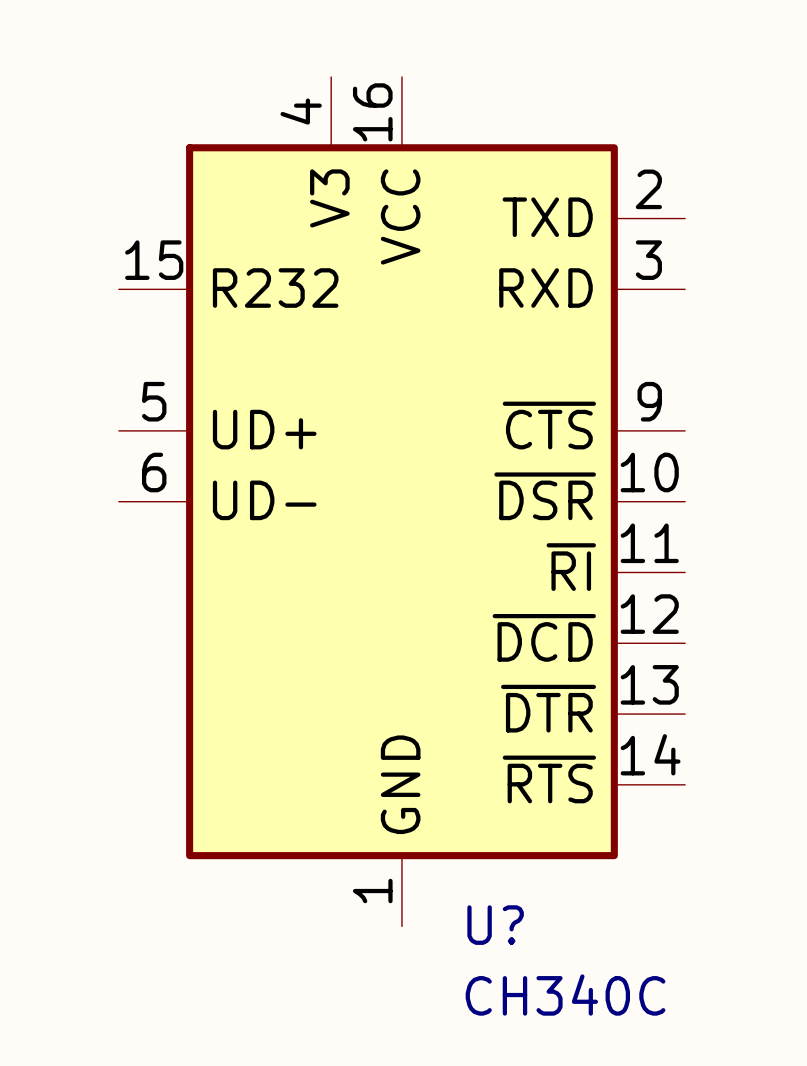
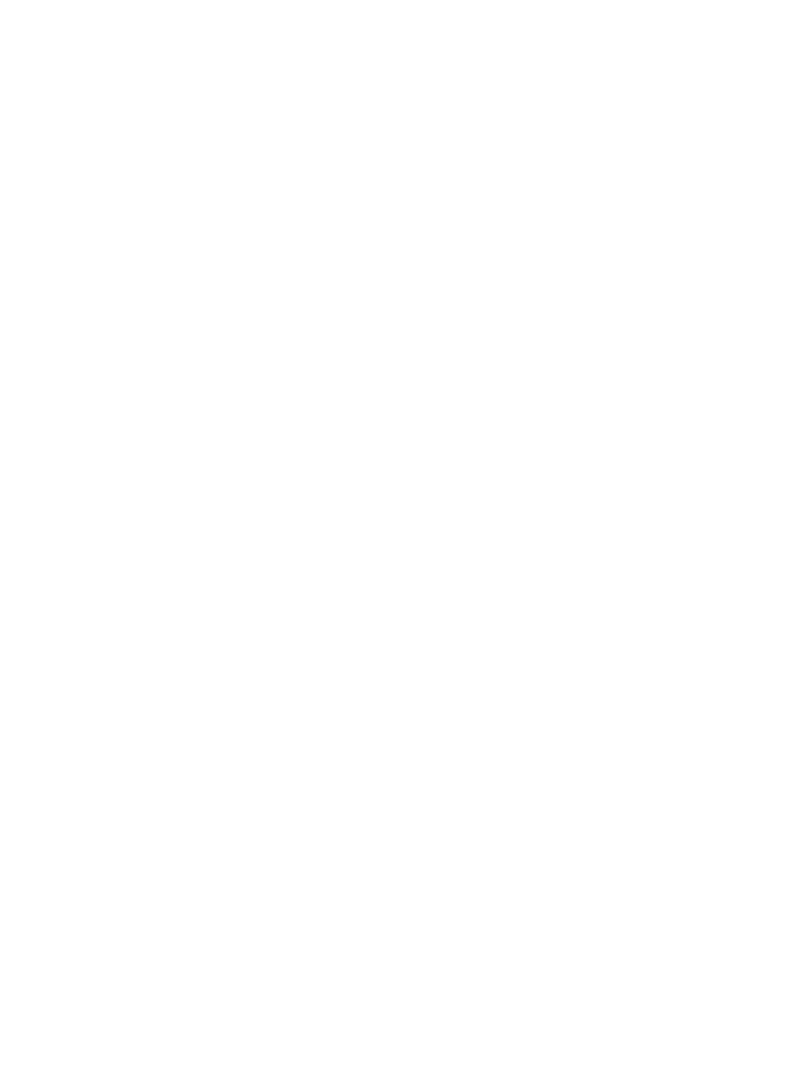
U?: CH340C (401, 501) -> none

